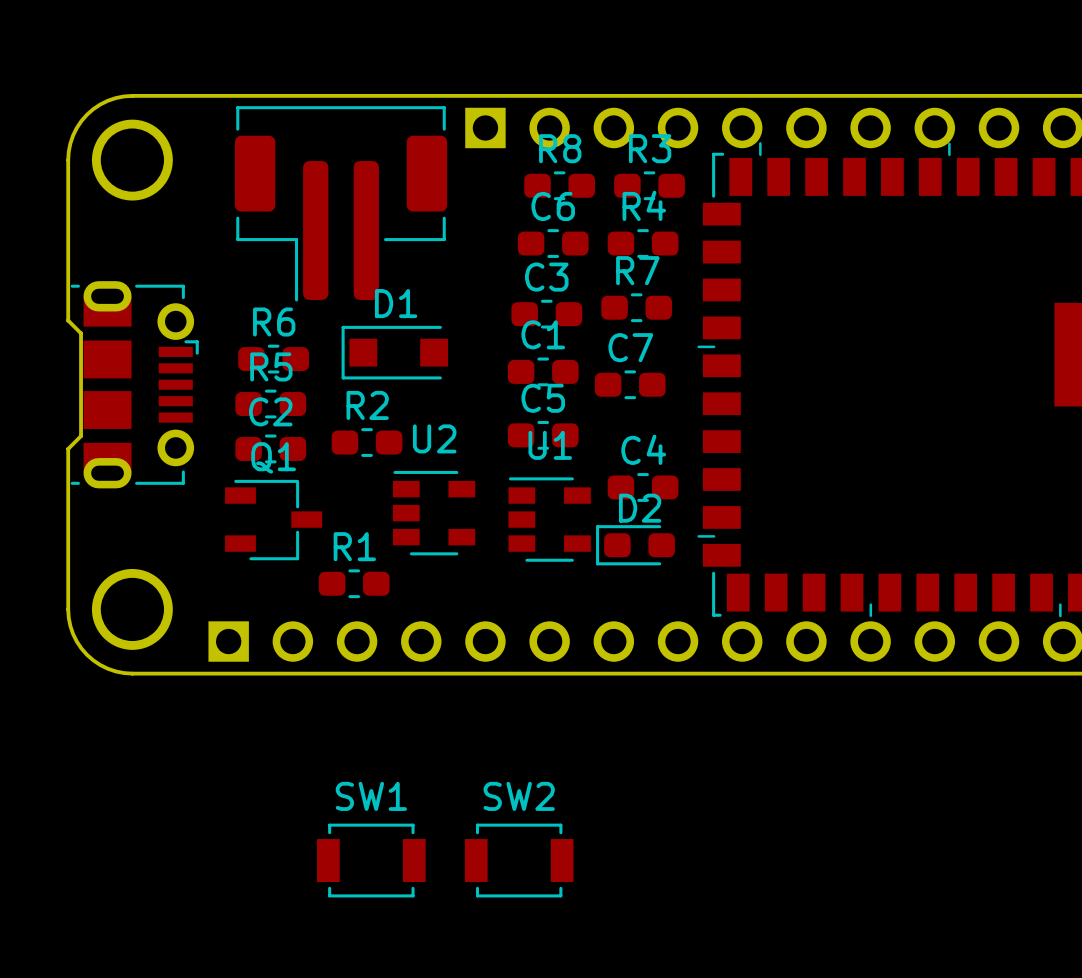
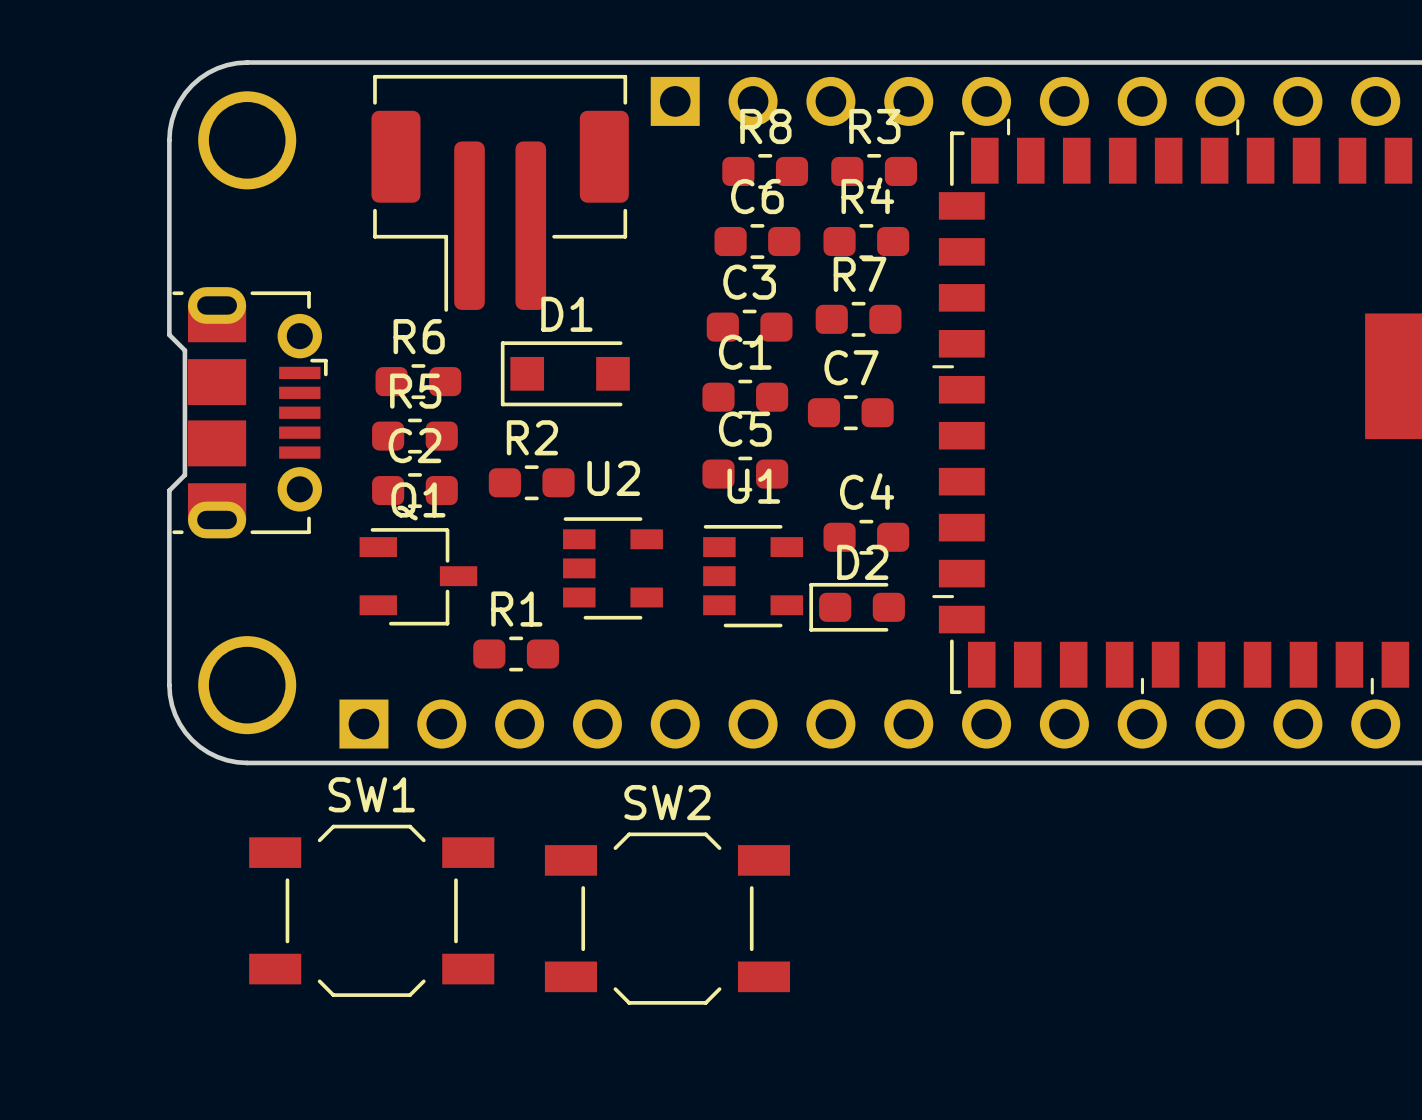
SW1 footprint: [317, 823, 426, 898] -> [249, 824, 495, 997]
SW2 footprint: [464, 823, 574, 898] -> [544, 832, 791, 1005]

